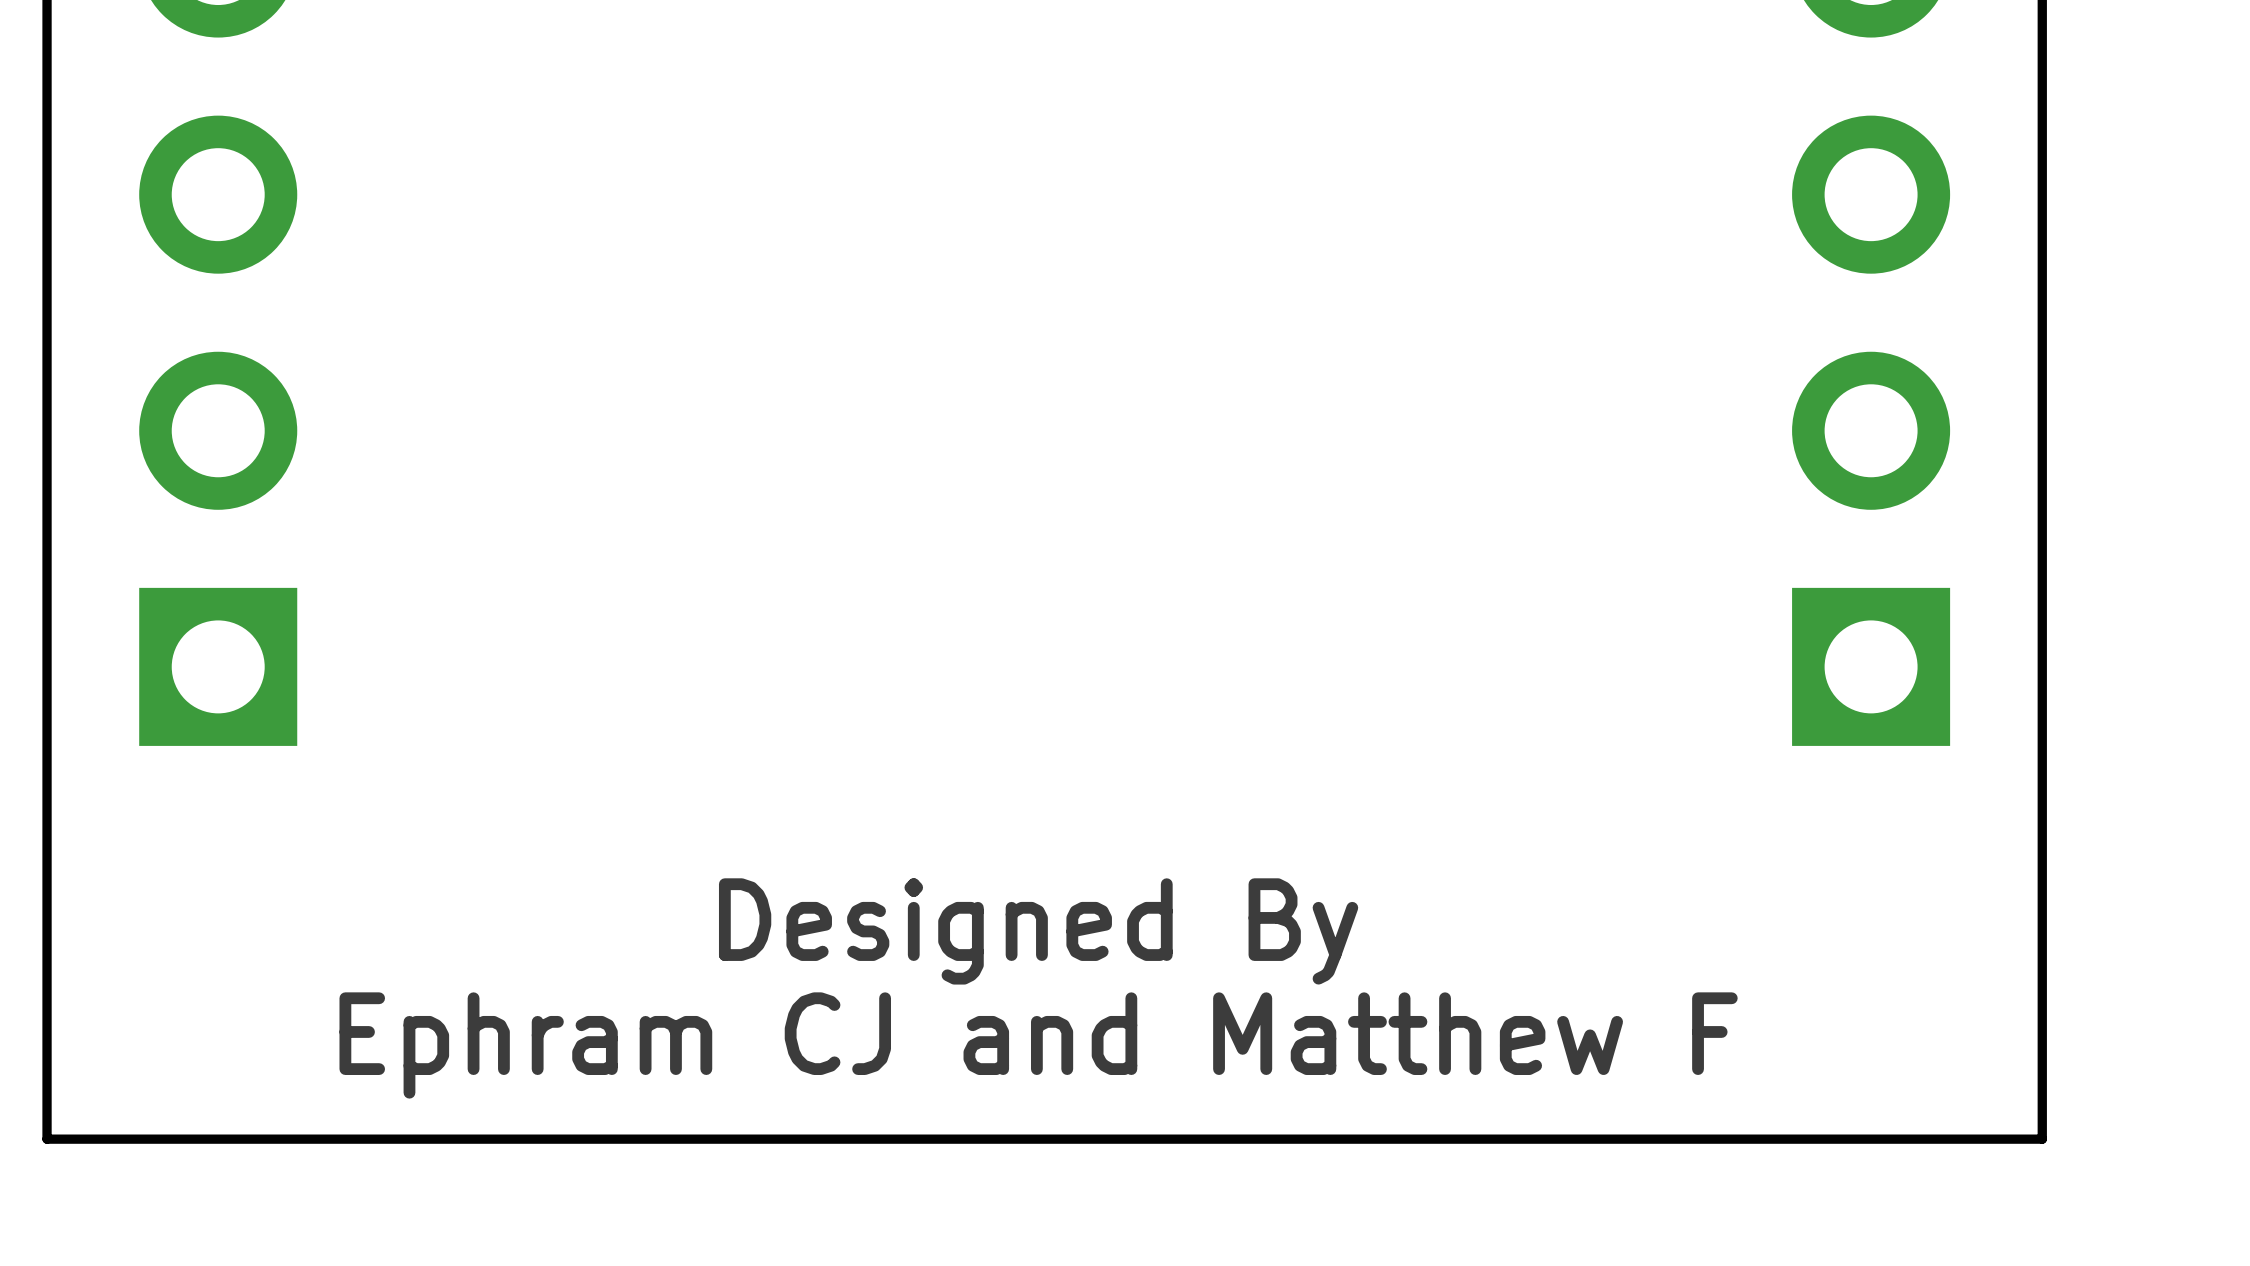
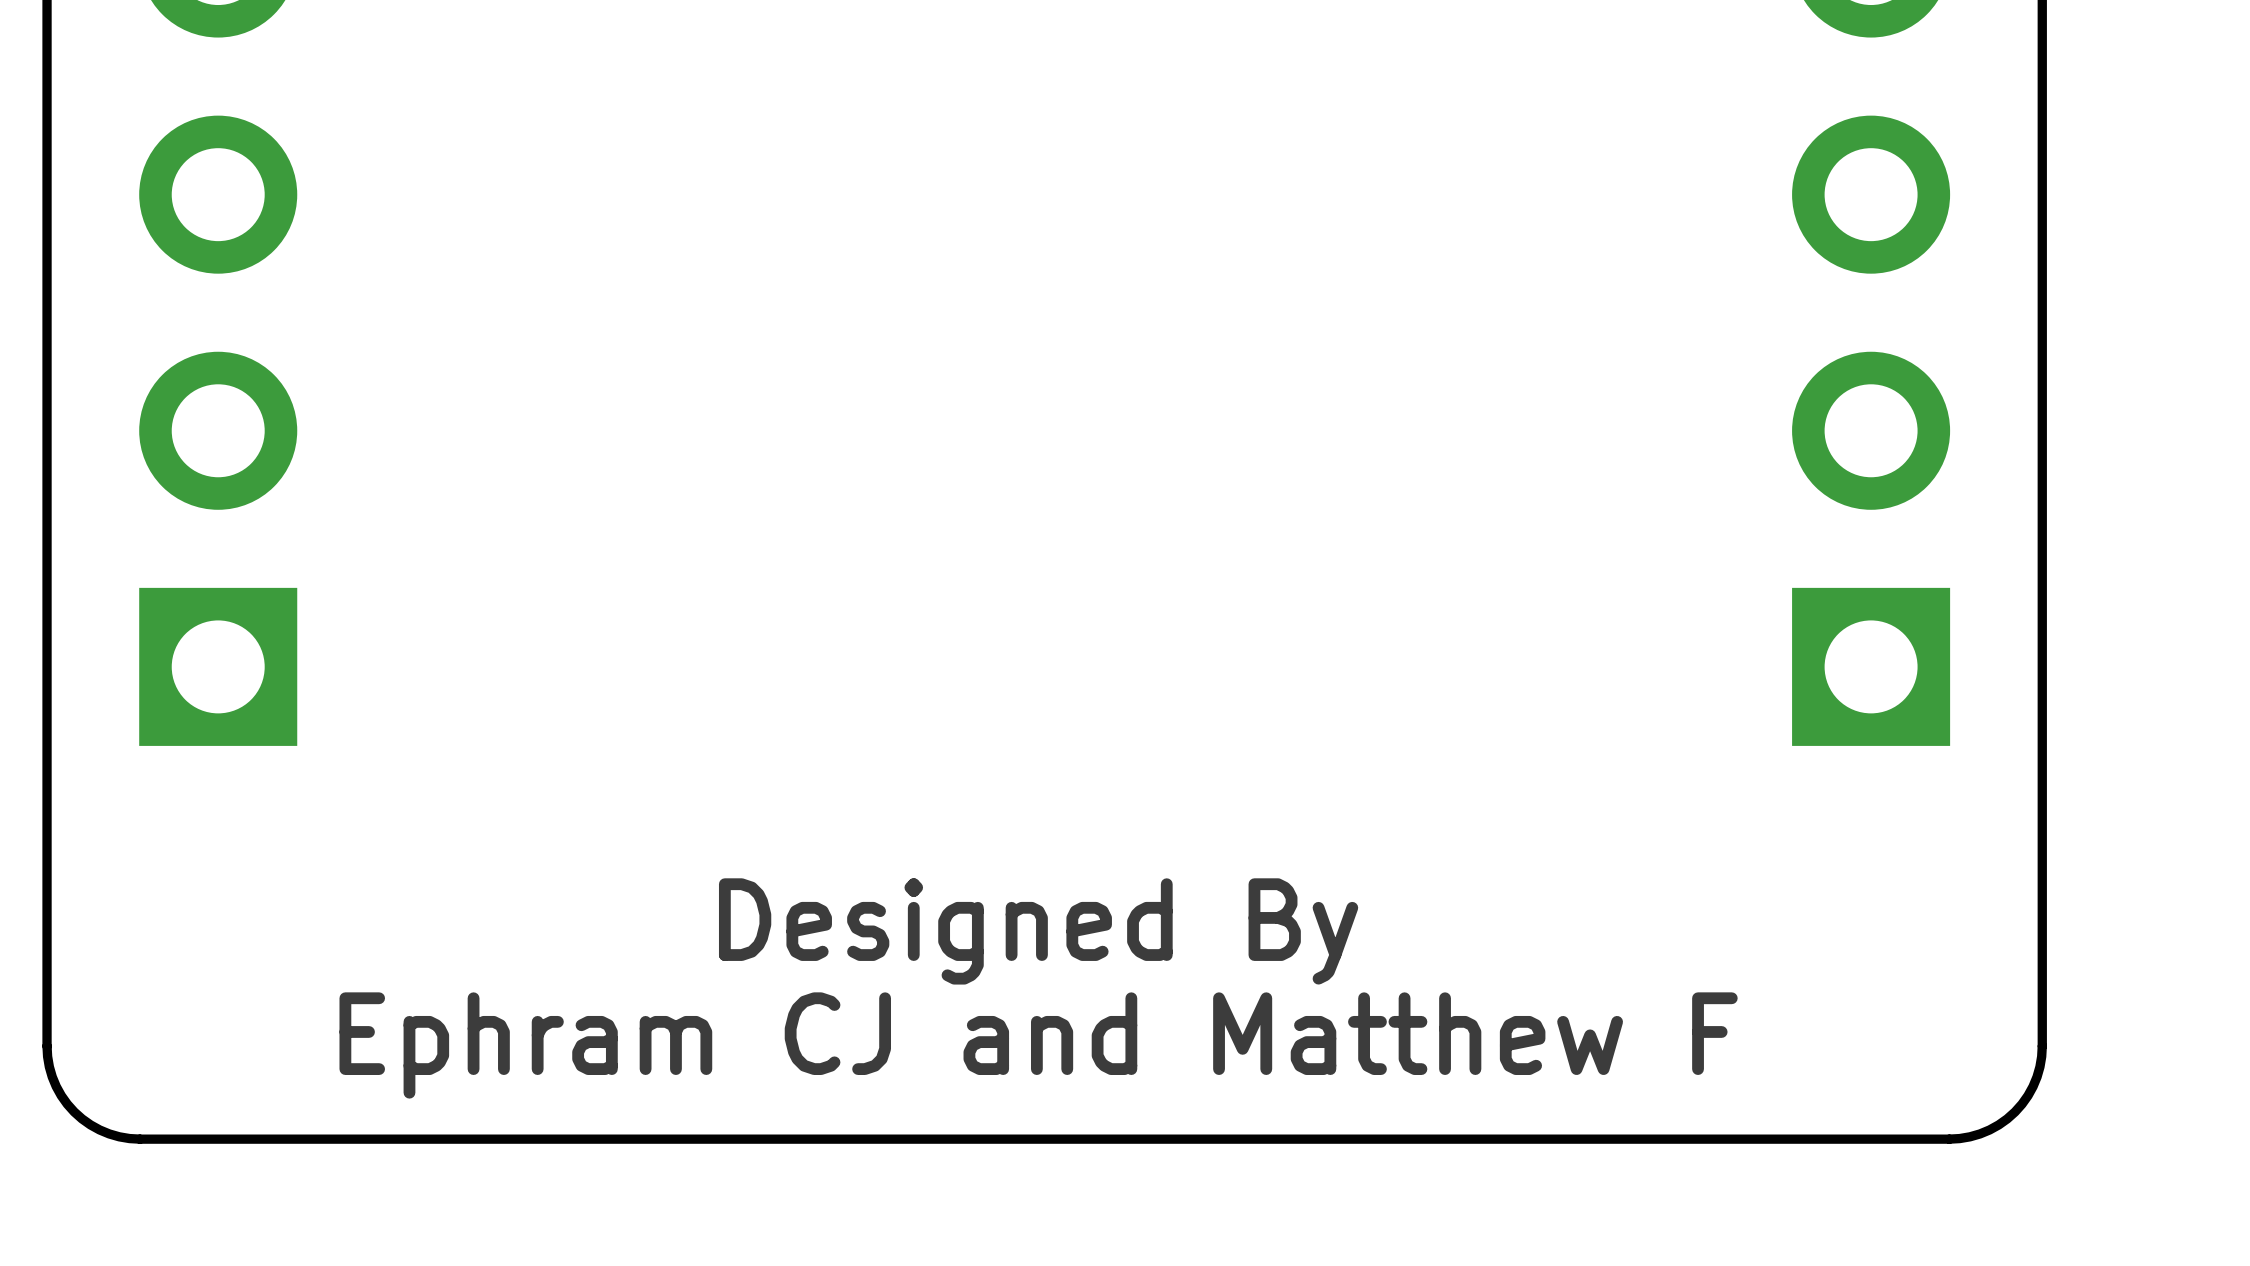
board edge: (47, 1046) (47, 1139) (139, 1139) -> (47, 1046) (52, 1076) (61, 1095) (74, 1111) (99, 1129) (119, 1136) (139, 1139)
board edge: (2042, 1046) (2042, 1139) (1949, 1139) -> (2042, 1046) (2037, 1076) (2028, 1095) (2015, 1111) (1998, 1124) (1980, 1133) (1949, 1139)

